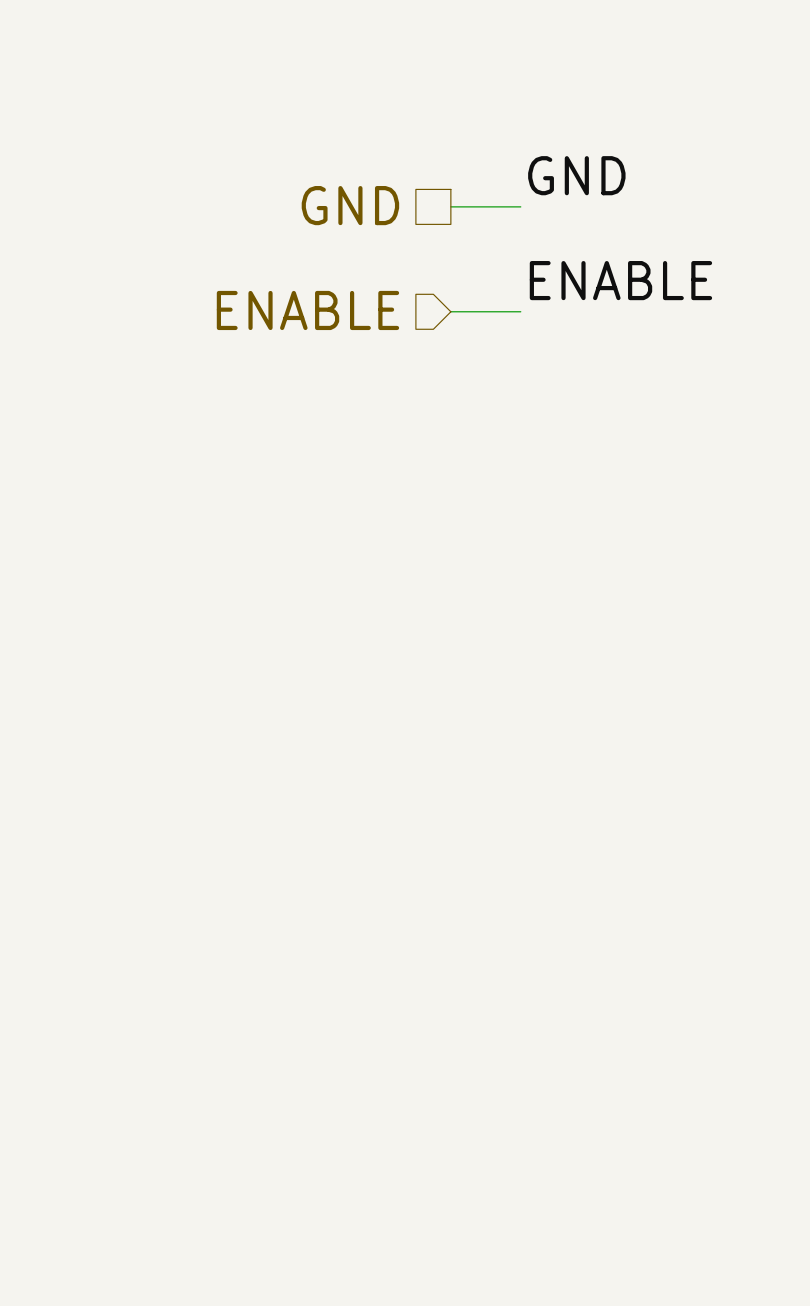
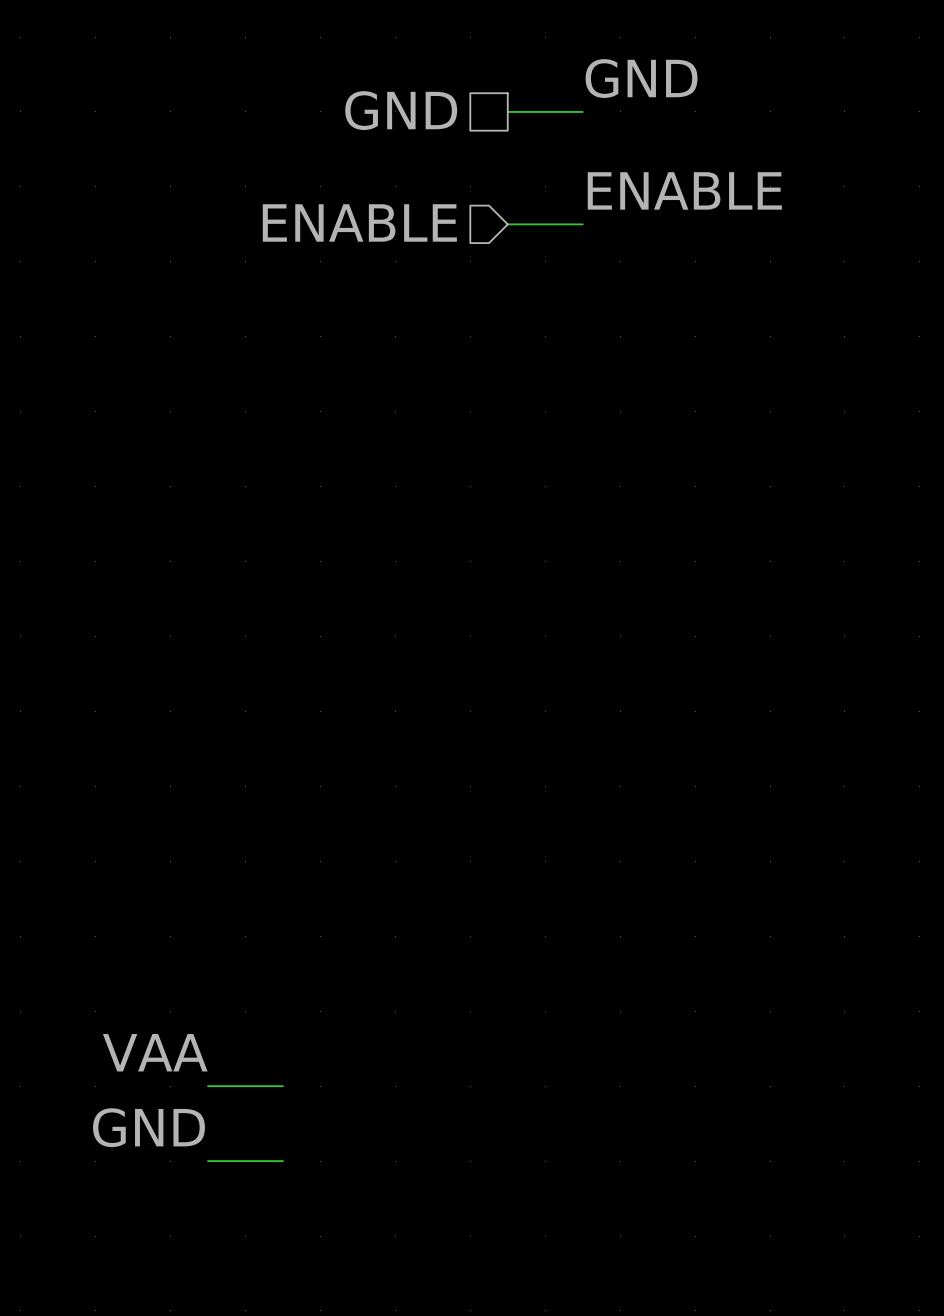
label: none -> VAA (155, 1052)
wire: none -> (208, 1086) (282, 1086)
label: none -> GND (149, 1127)
wire: none -> (208, 1161) (282, 1161)

